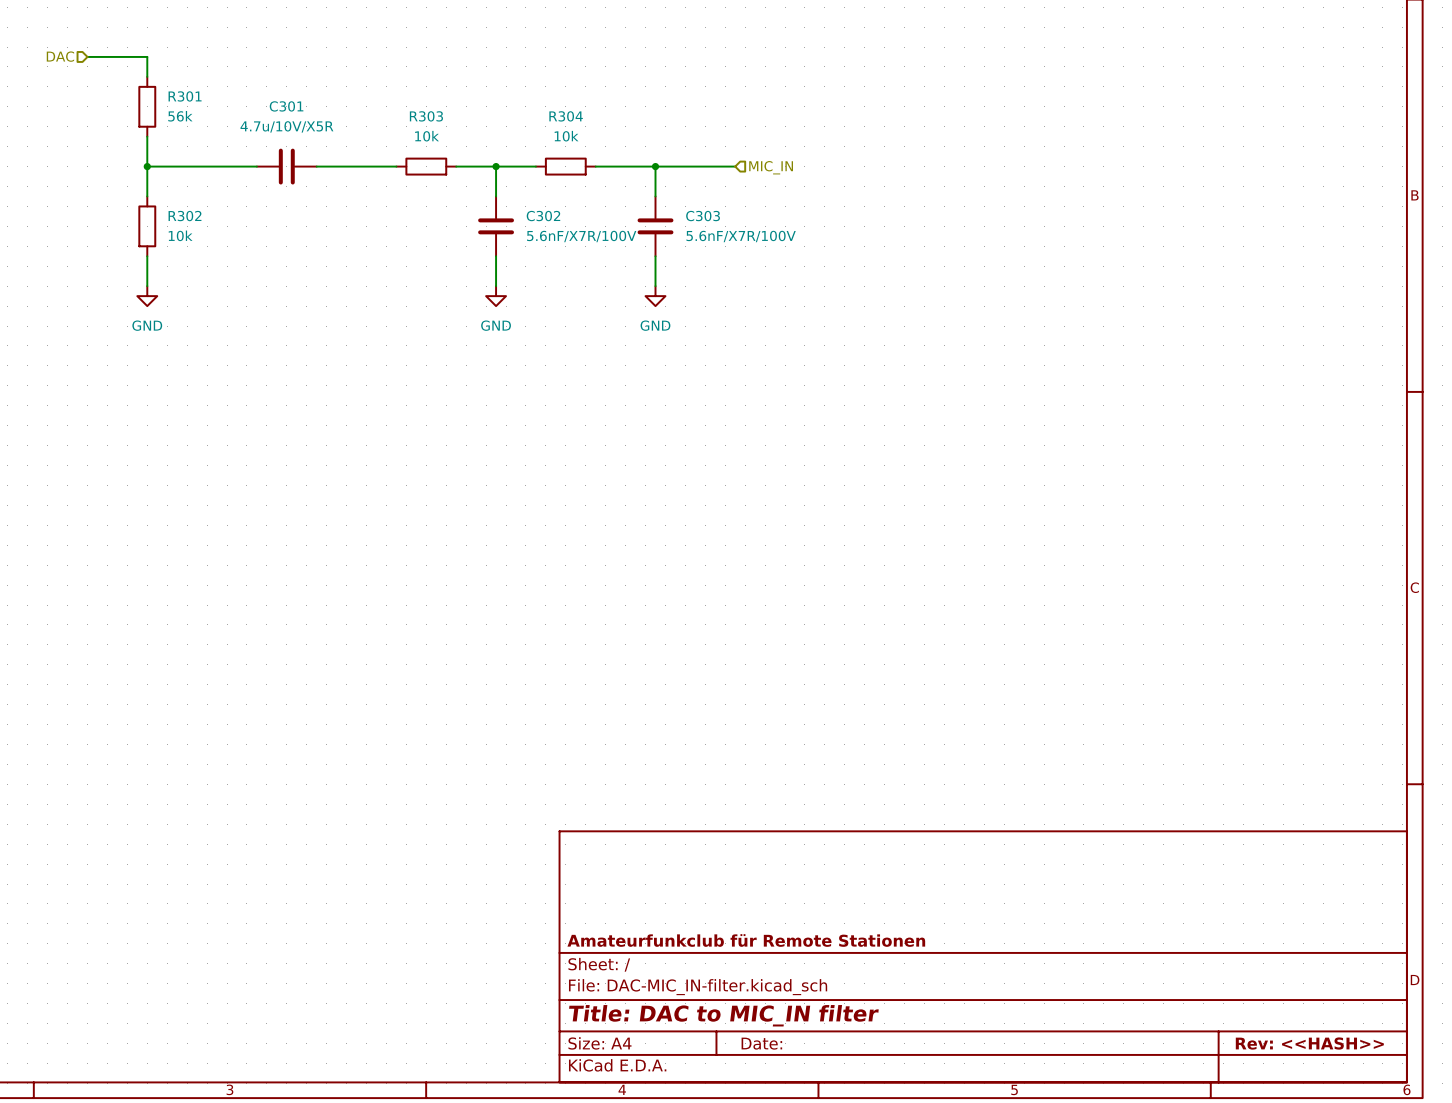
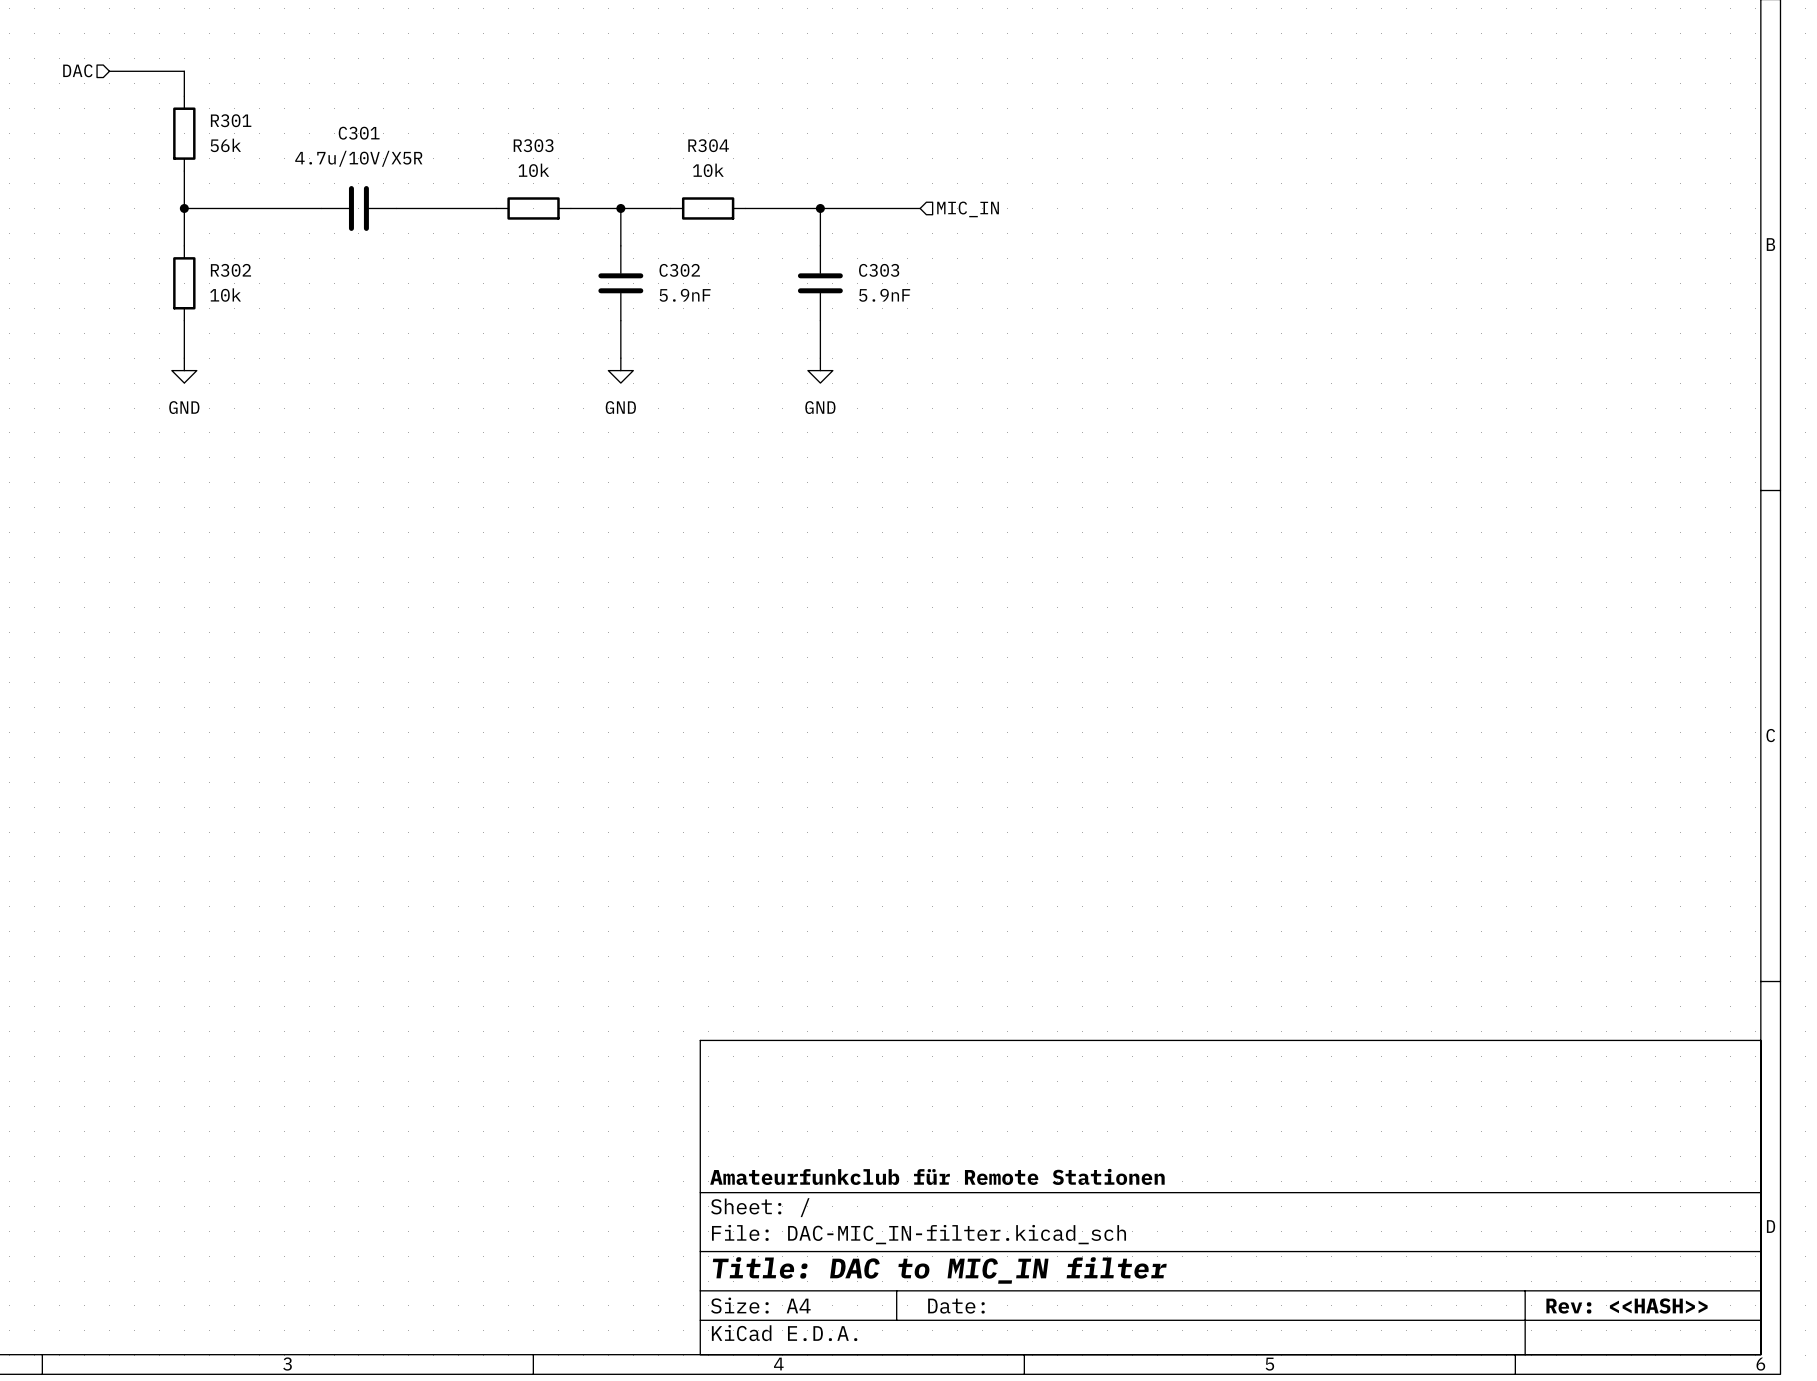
C302 value: 5.6nF/X7R/100V (581, 236) -> 5.9nF (685, 295)
C303 value: 5.6nF/X7R/100V (741, 236) -> 5.9nF (884, 295)

